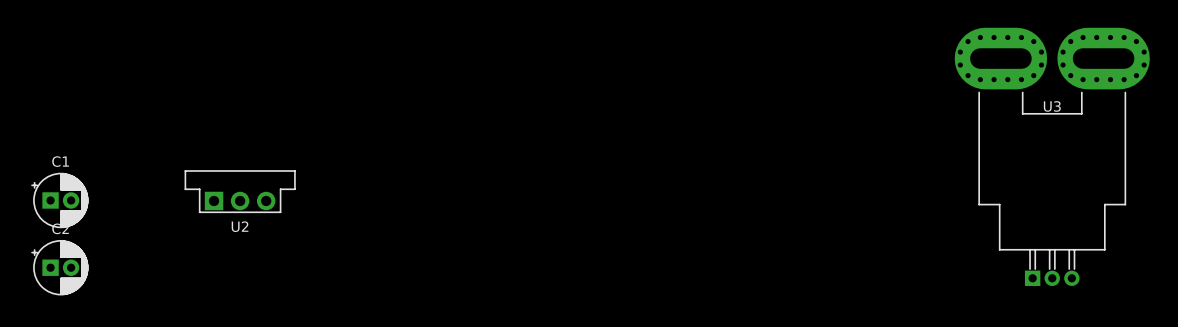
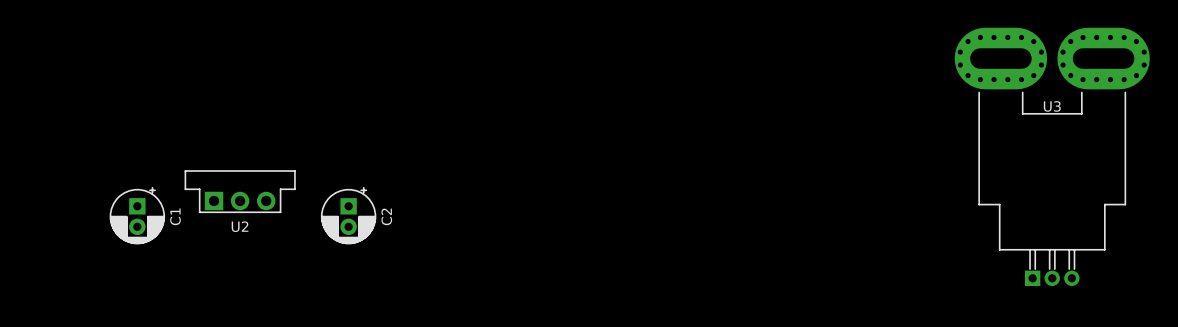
C1 rotation: 0° (59, 200) -> 90° clockwise (137, 215)
C1 position: (59, 200) -> (137, 215)
C2 rotation: 0° (59, 267) -> 90° clockwise (348, 215)
C2 position: (59, 267) -> (348, 215)

